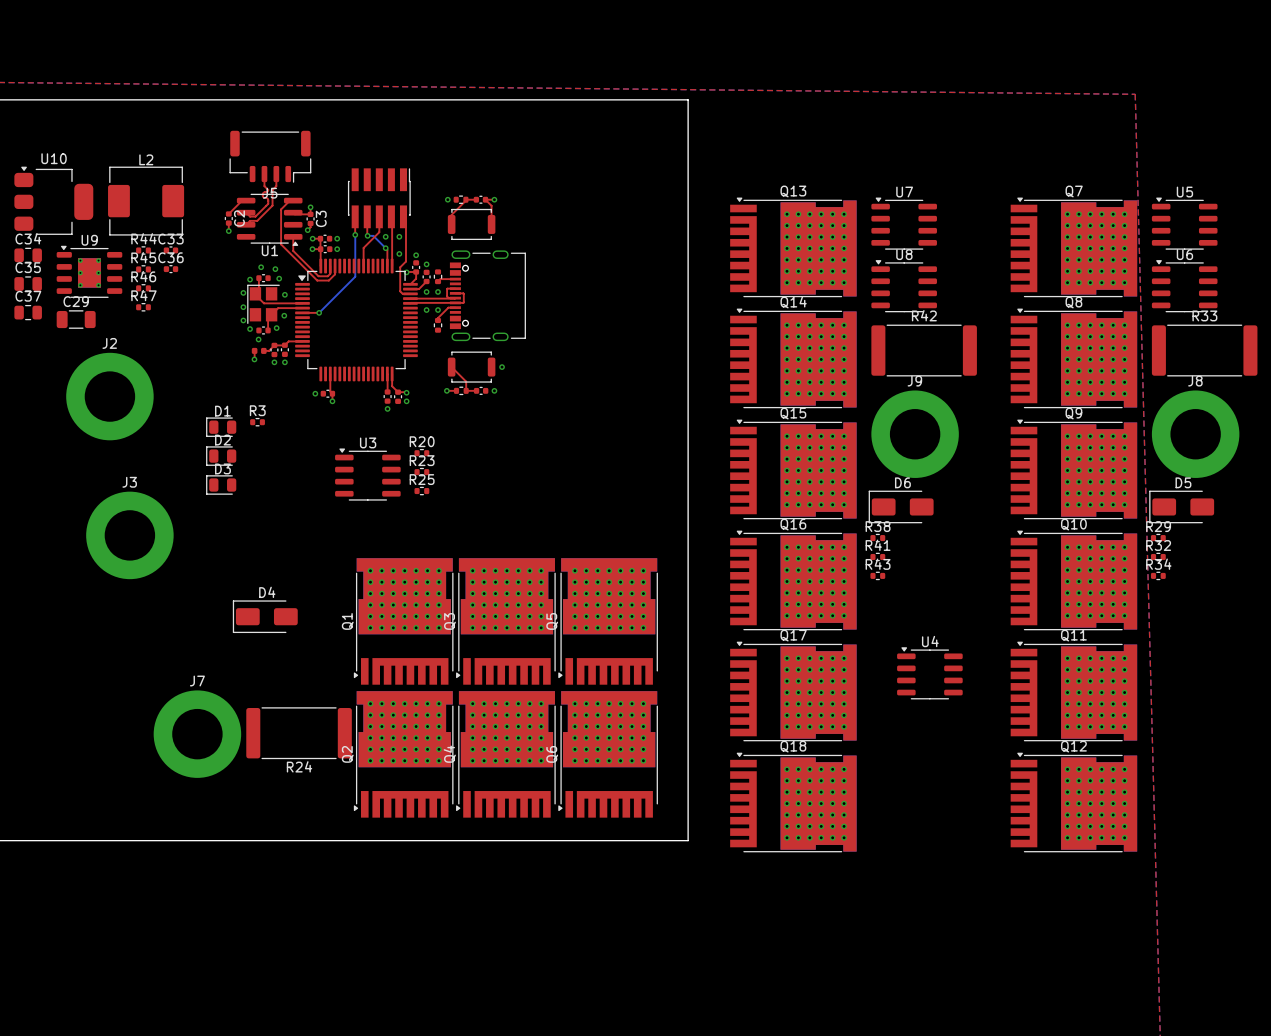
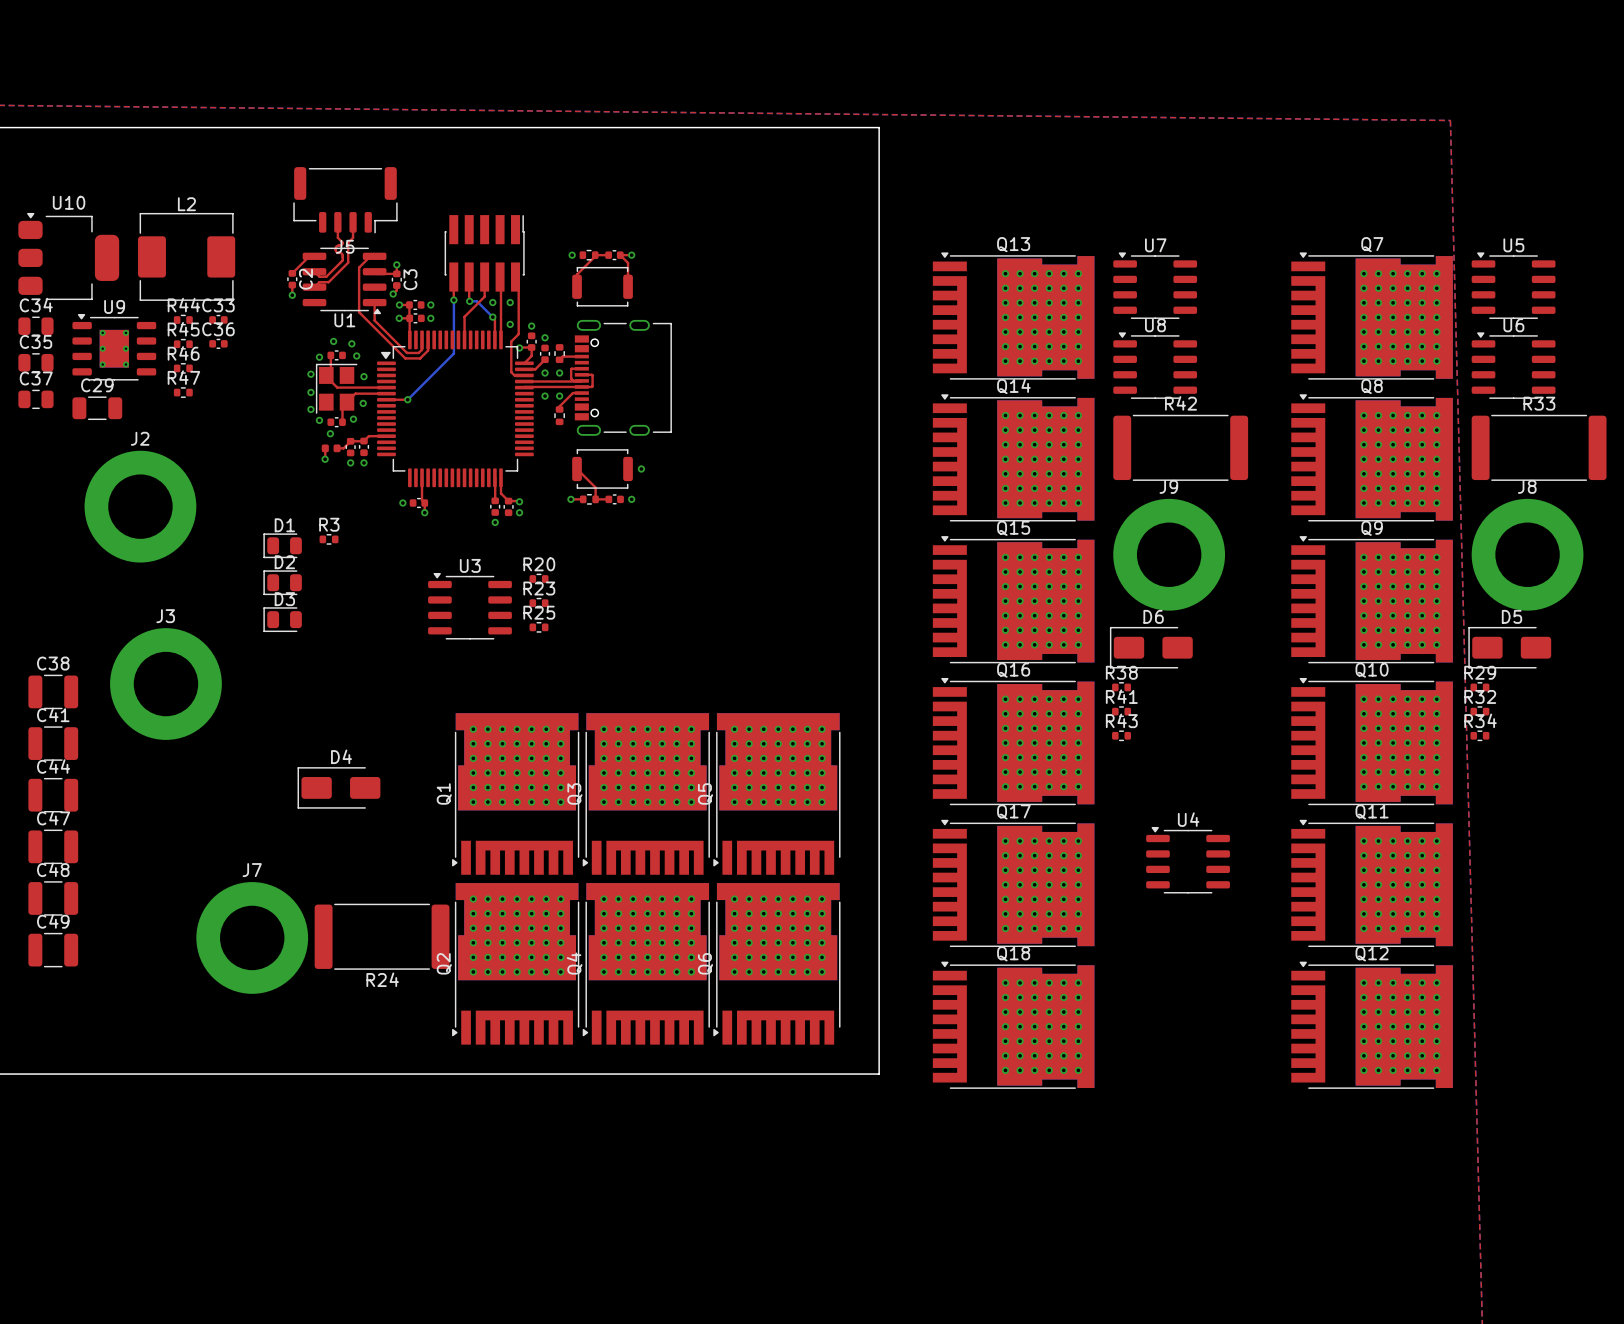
C38: none -> (53, 691)
C41: none -> (53, 743)
C44: none -> (53, 795)
C47: none -> (53, 846)
C48: none -> (53, 898)
C49: none -> (53, 950)

